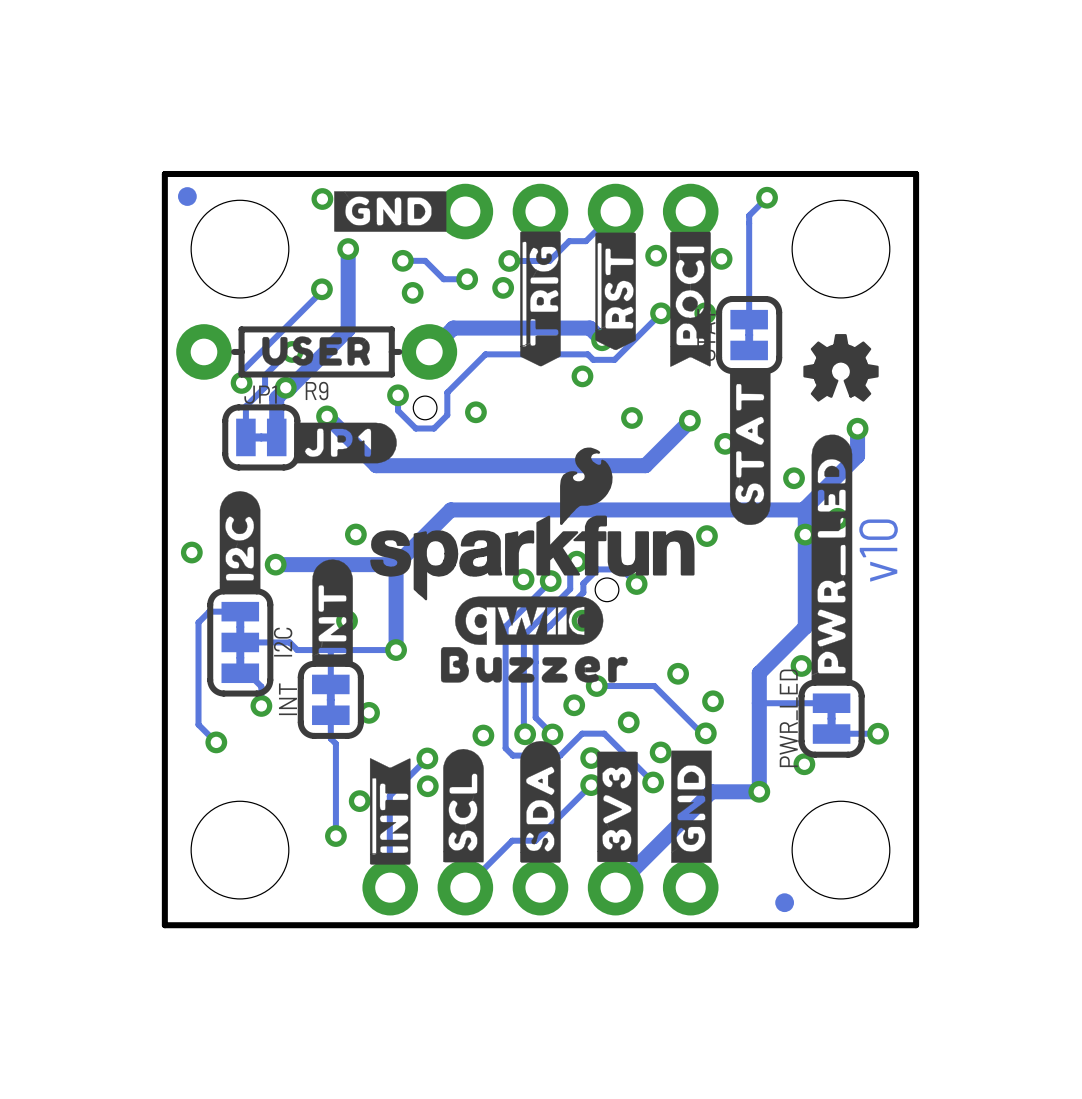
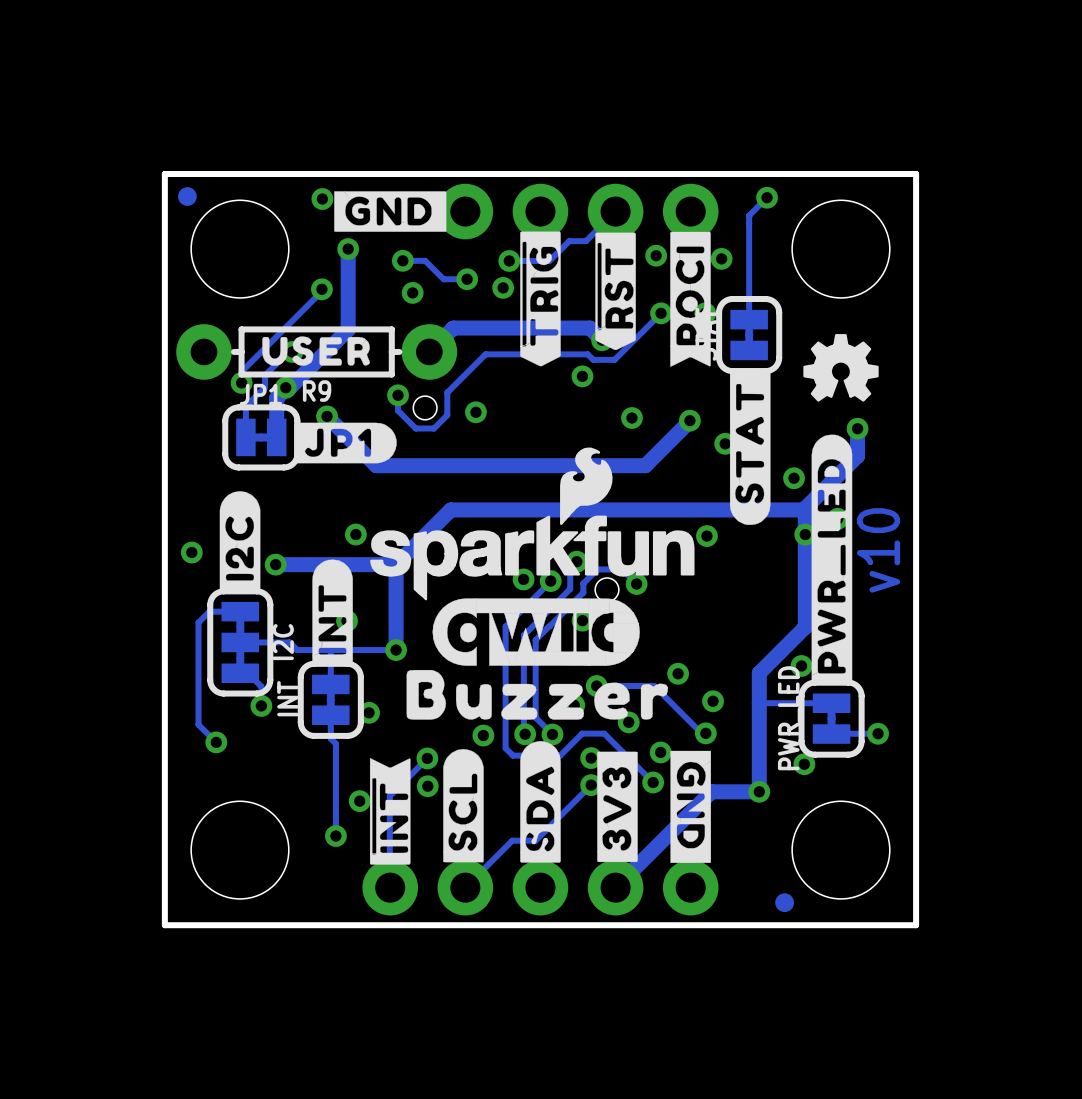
drawing shape: [455, 596, 604, 645] -> [432, 598, 640, 666]
drawing: [440, 647, 628, 683] -> none
drawing: none -> [406, 669, 669, 720]
drawing shape: [671, 750, 712, 863] -> [670, 750, 711, 863]

